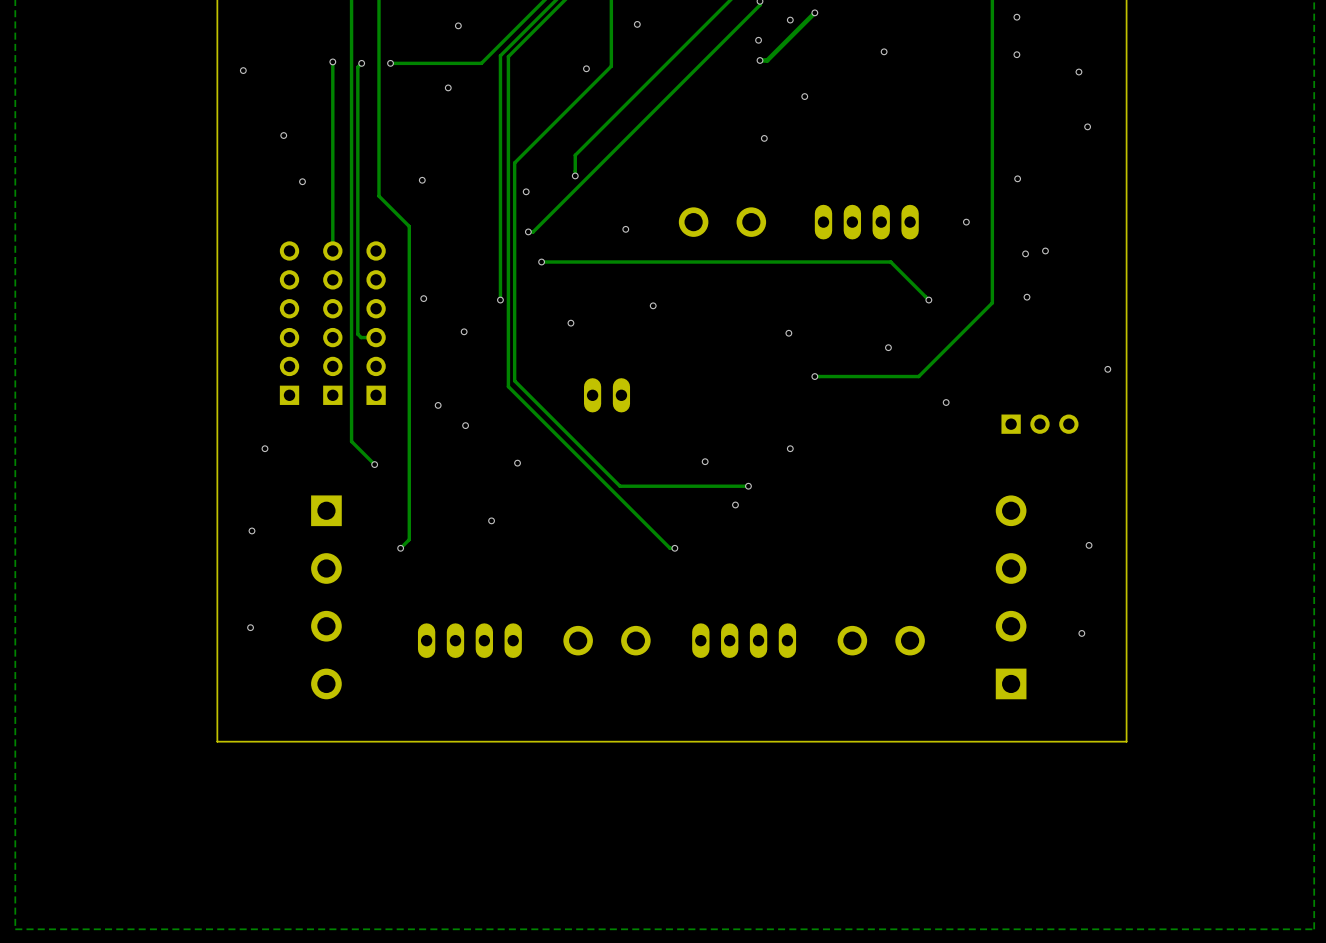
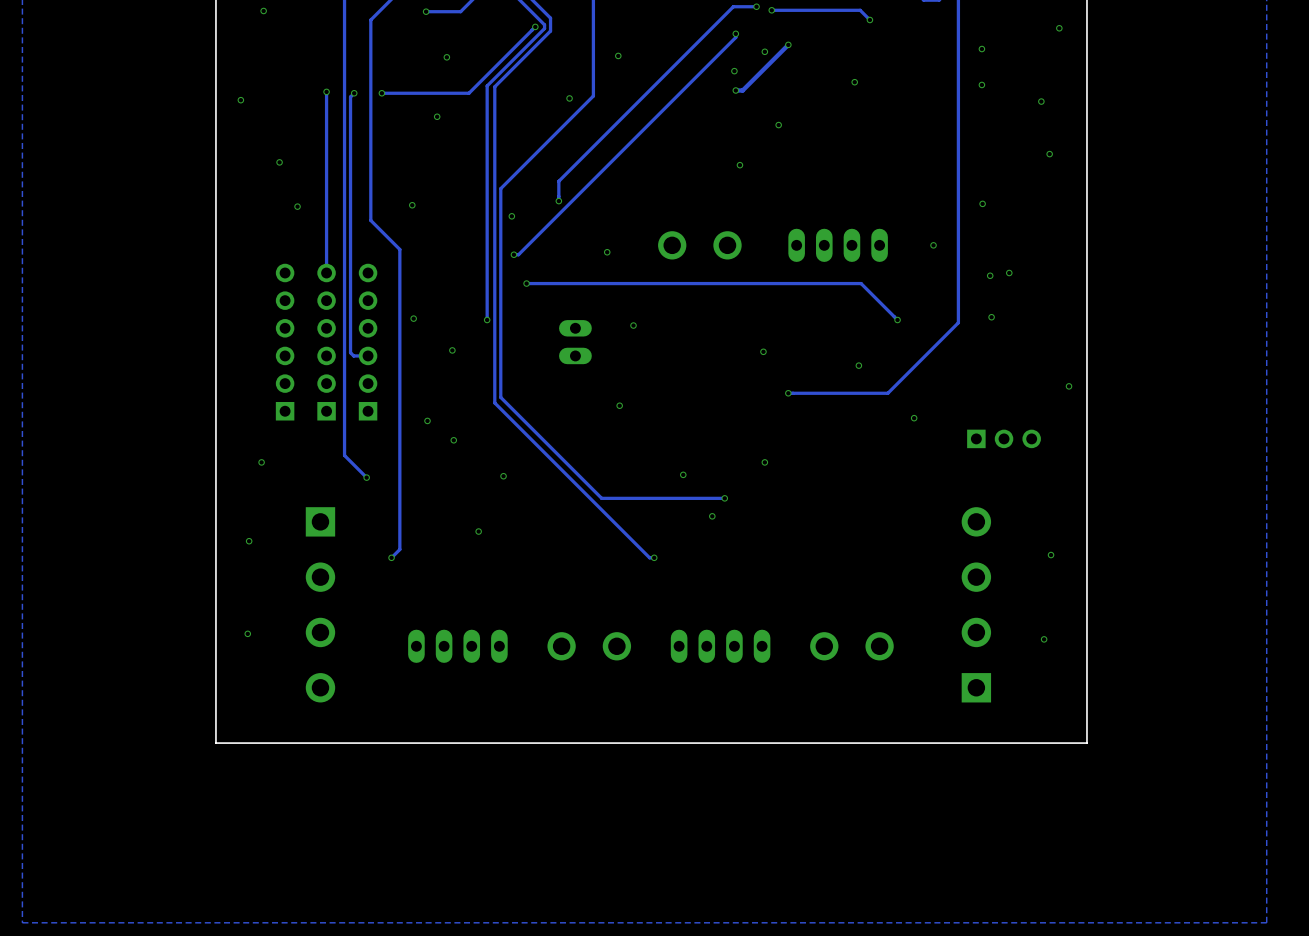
via: (570, 323) -> none
via: none -> (619, 405)
part rotation: 0° (607, 395) -> 90° clockwise (575, 342)
part position: (607, 395) -> (575, 342)

